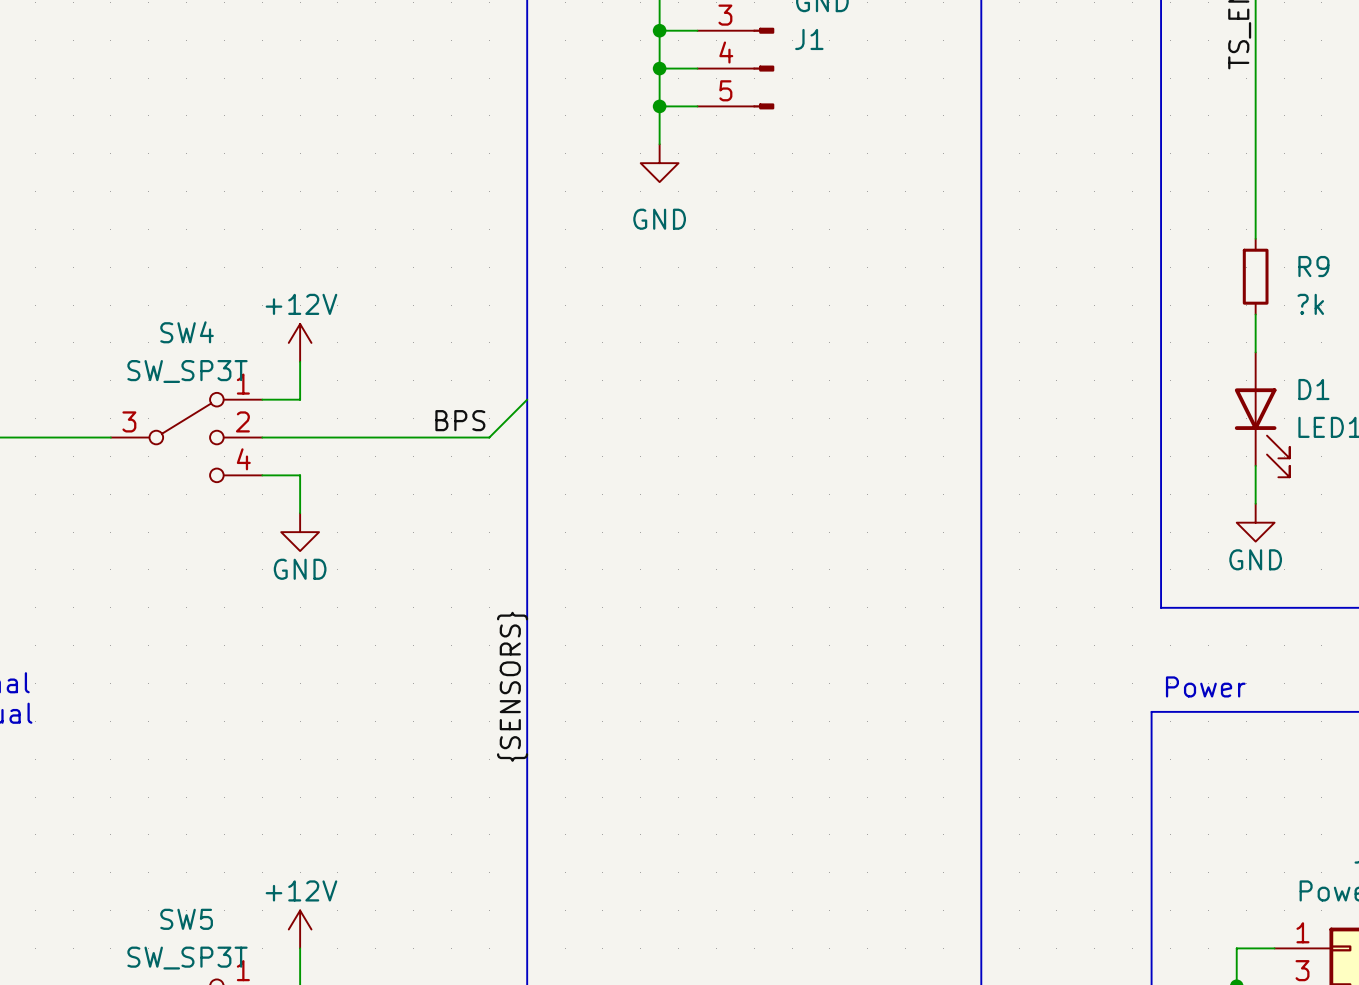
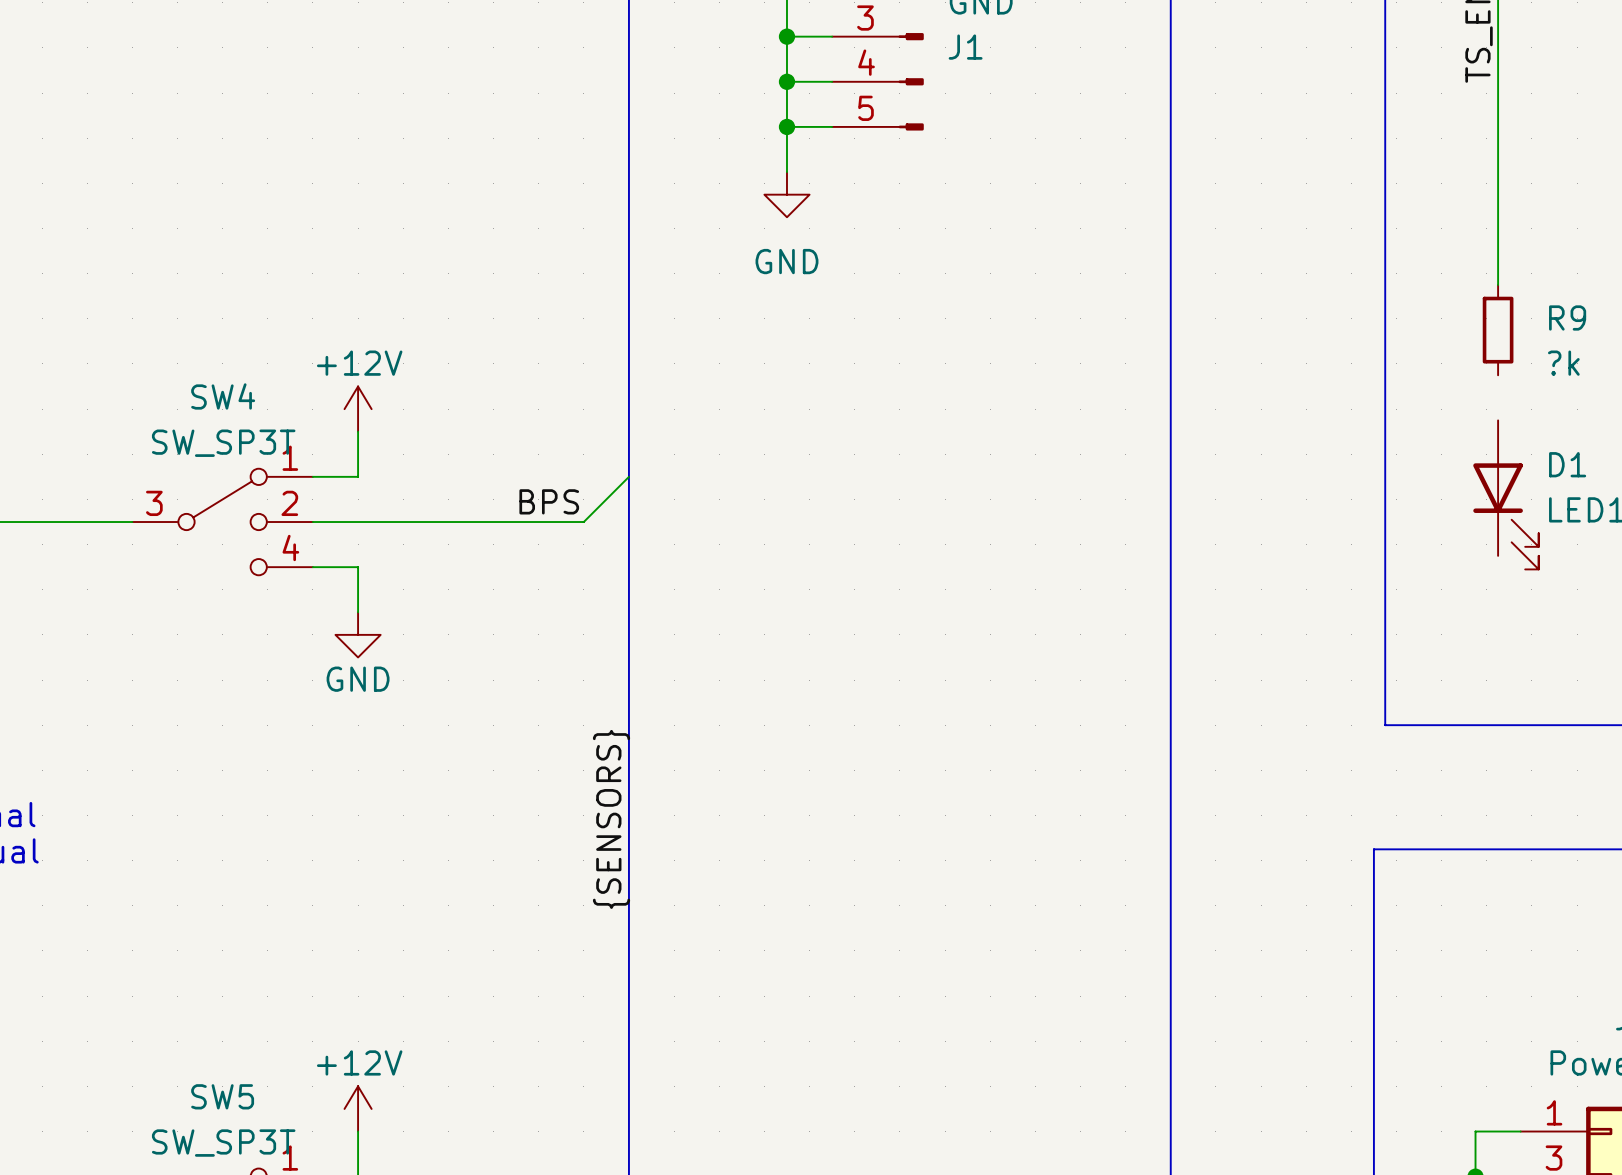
wire: (1255, 314) (1255, 352) -> none
wire: (1255, 465) (1255, 503) -> none
power symbol: GND (1255, 522) -> none
text: Power (1205, 686) -> none

